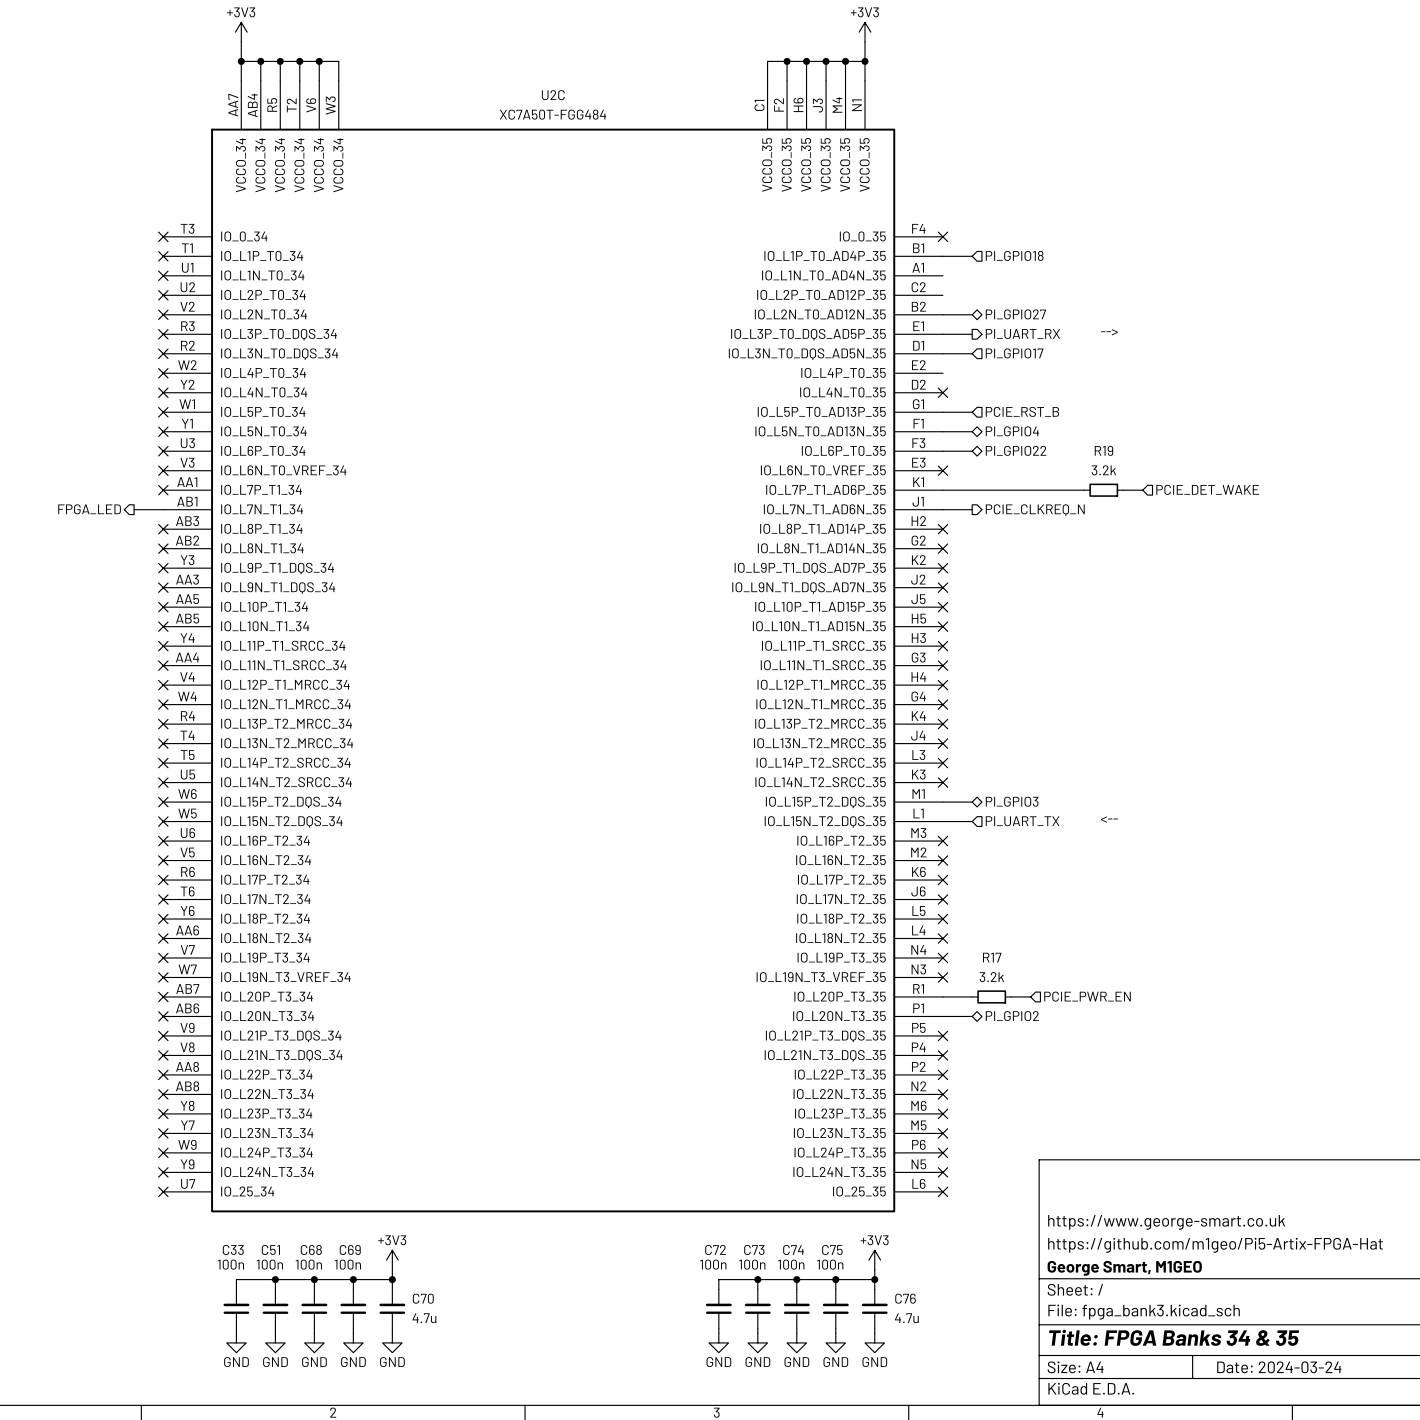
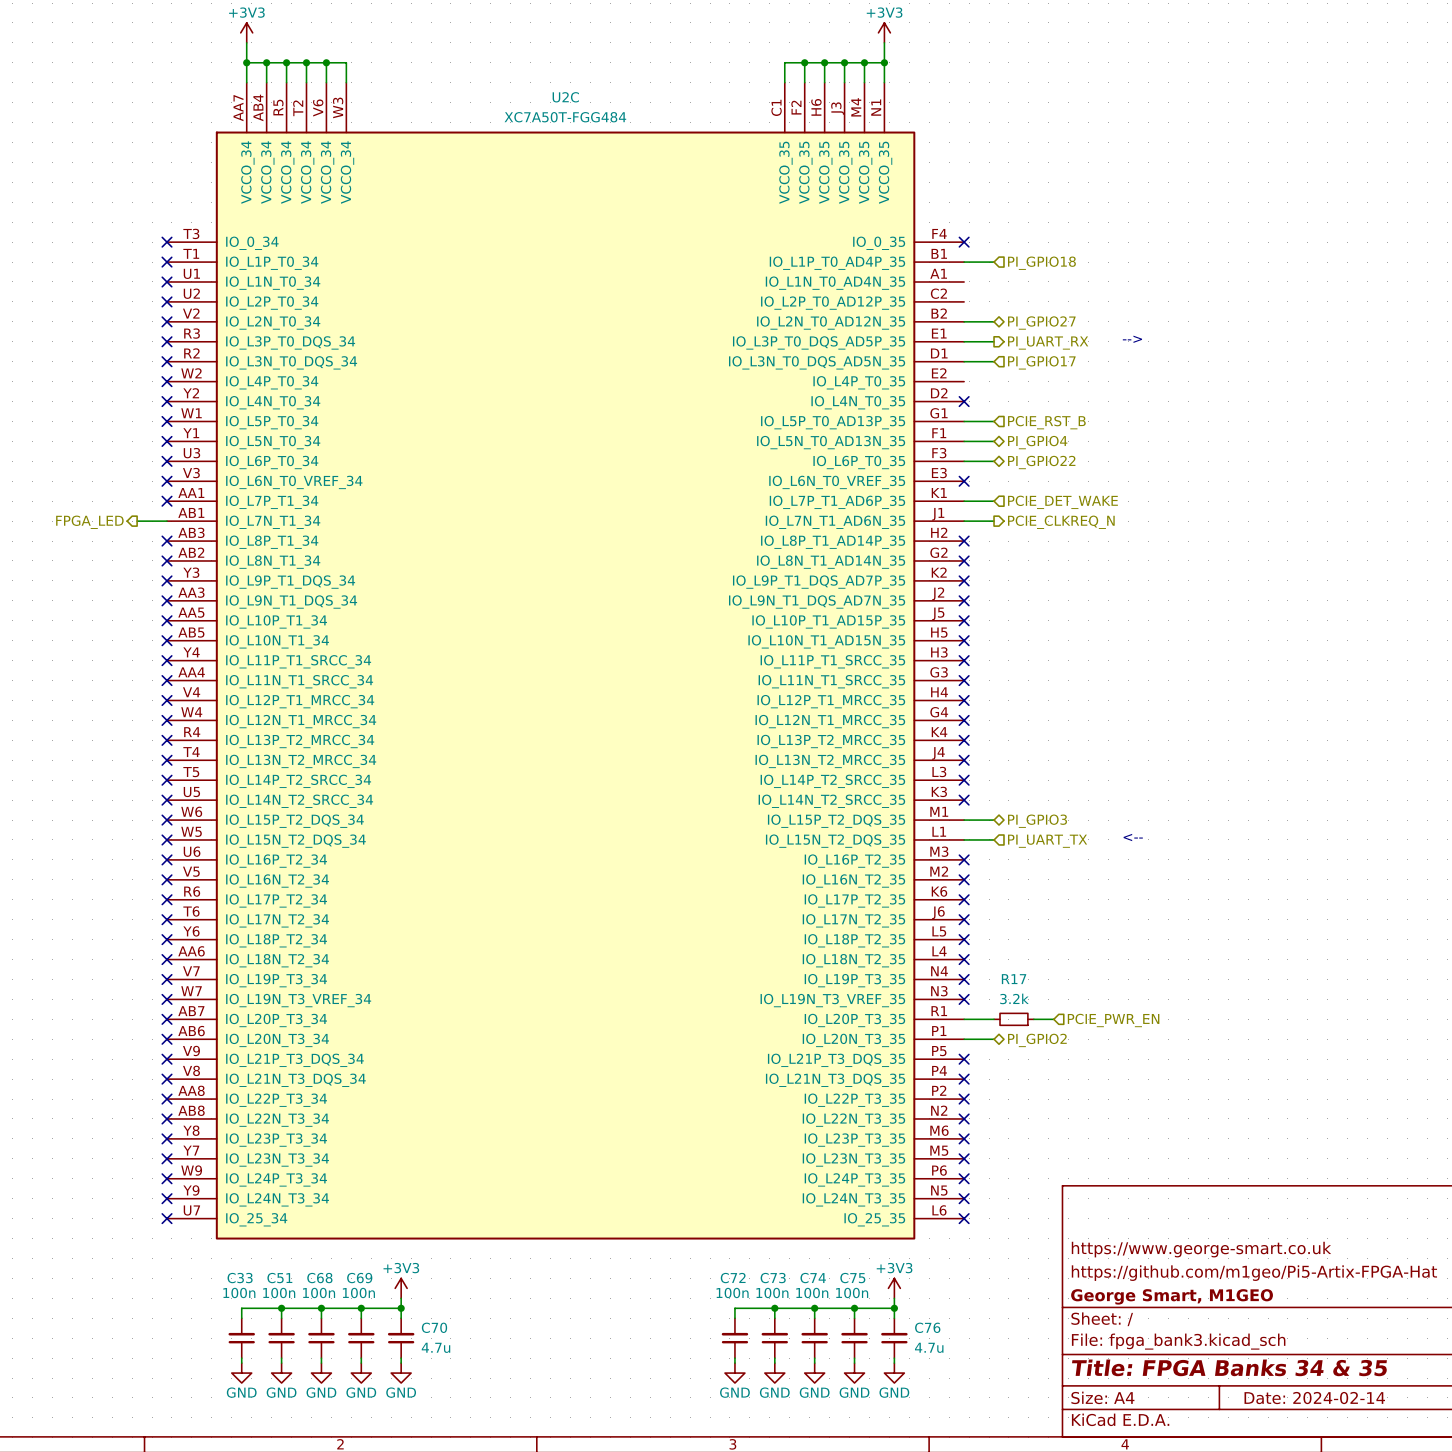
hierarchical label position: PCIE_DET_WAKE (1207, 489) -> PCIE_DET_WAKE (1062, 502)
wire: (972, 490) (1084, 490) -> none
R19: 3.2k (1103, 490) -> none
wire: (1123, 490) (1142, 490) -> none
title block: Date: 2024-03-24 (1279, 1367) -> Date: 2024-02-14 (1314, 1398)

